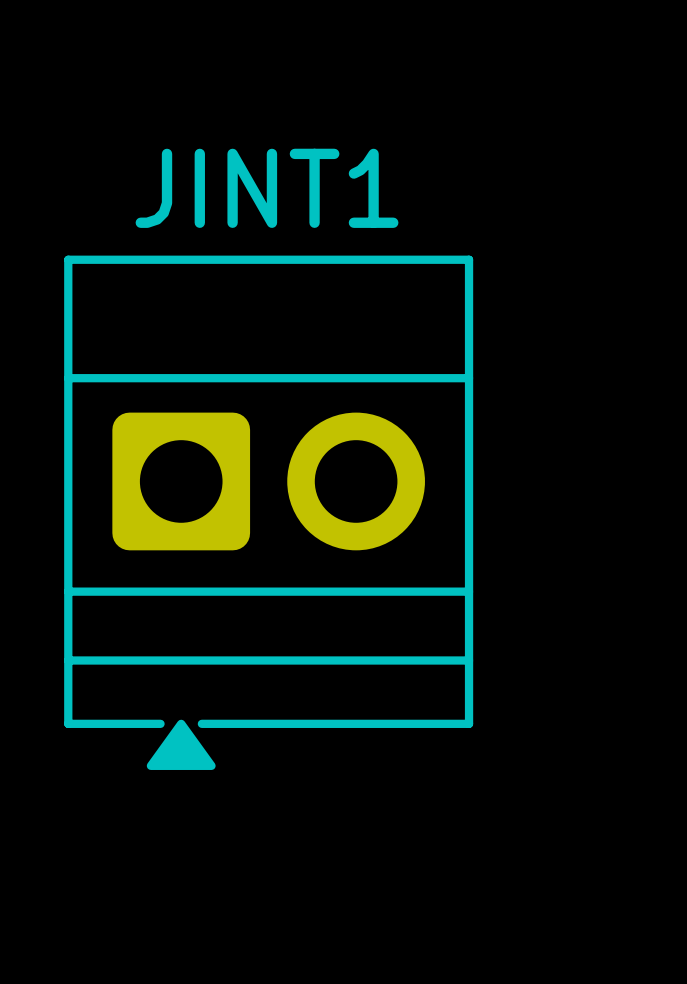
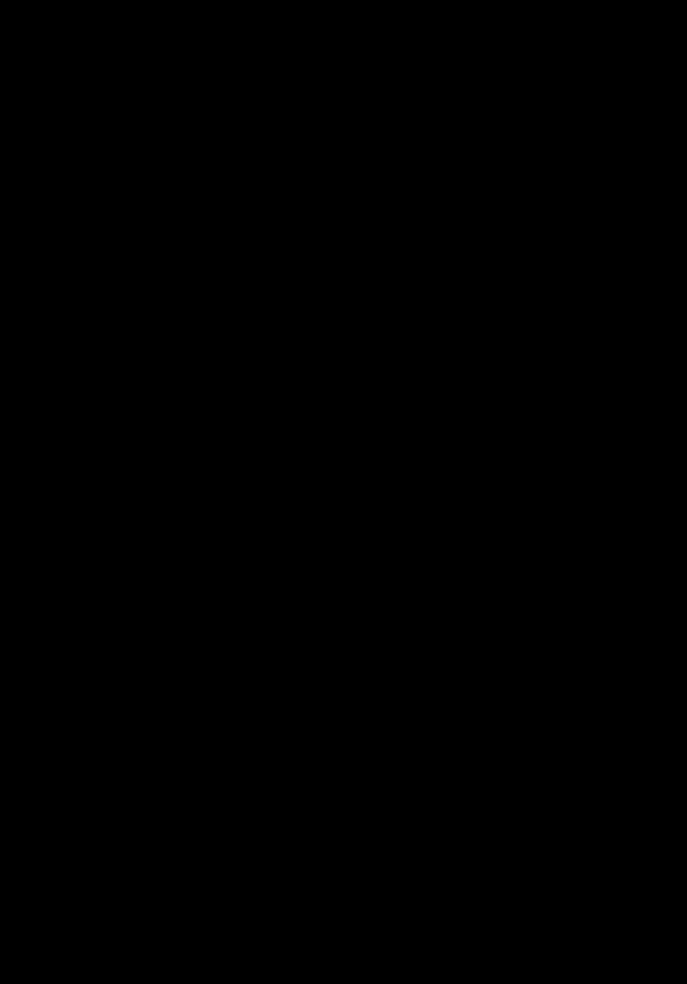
JINT1: (268, 512) -> none

